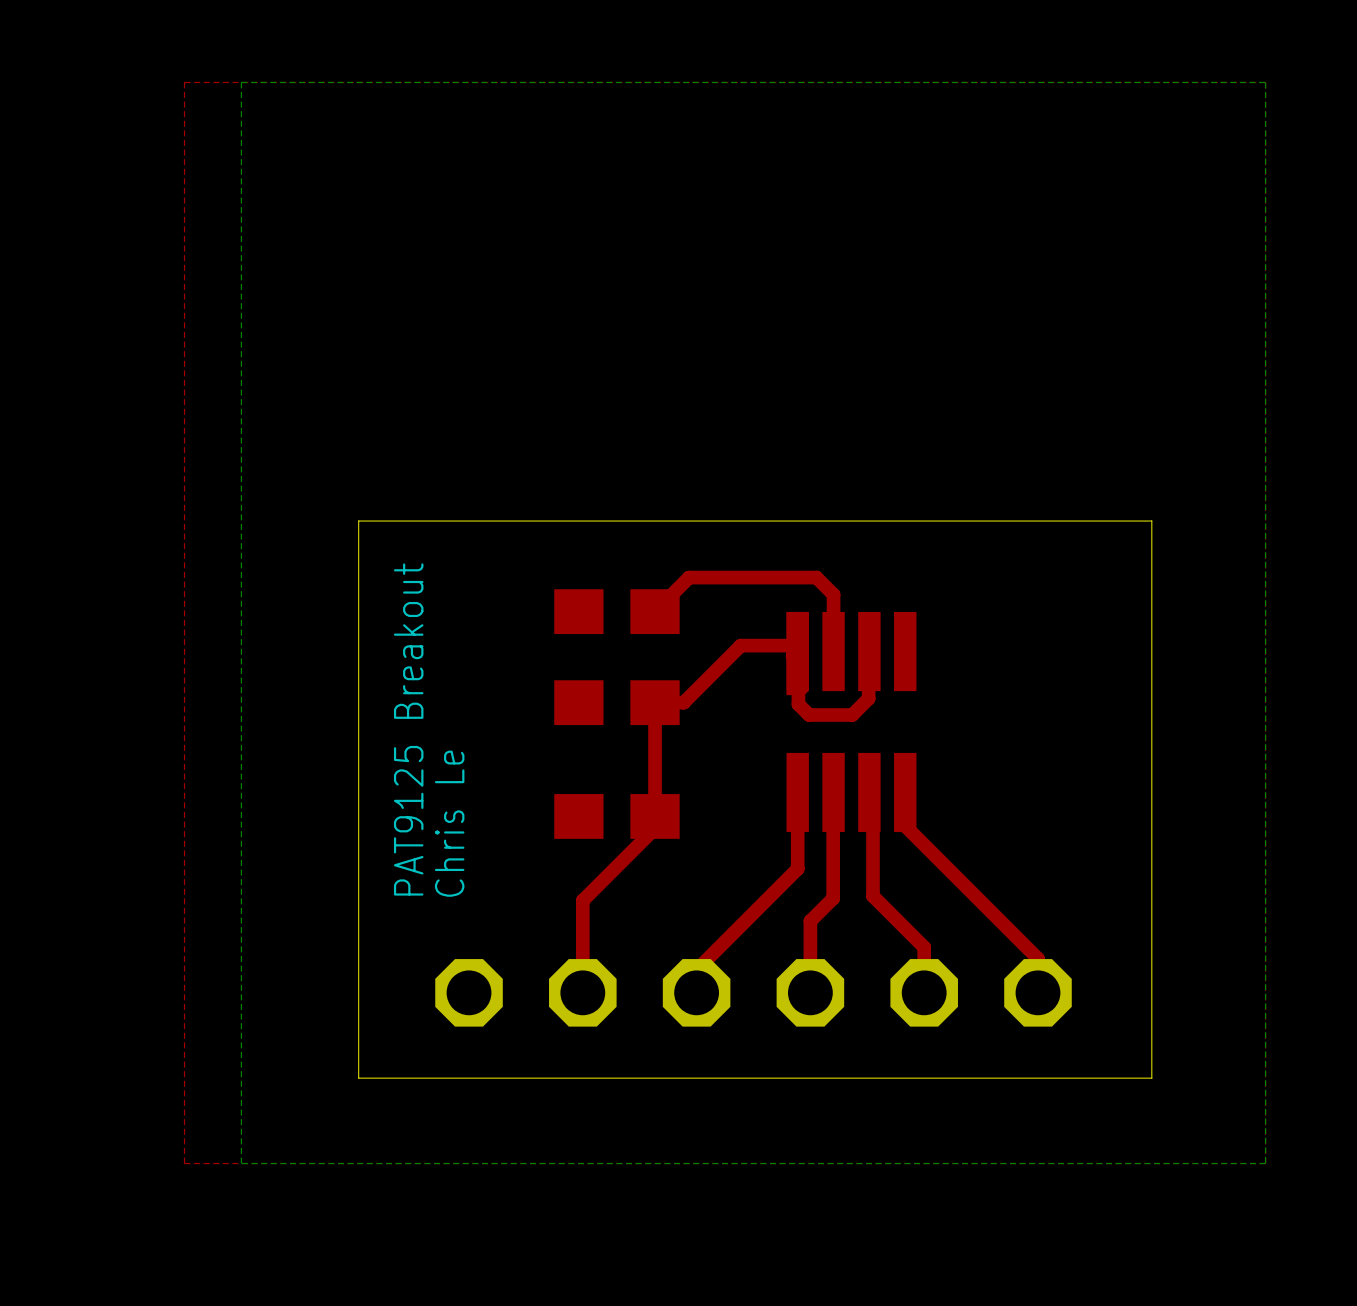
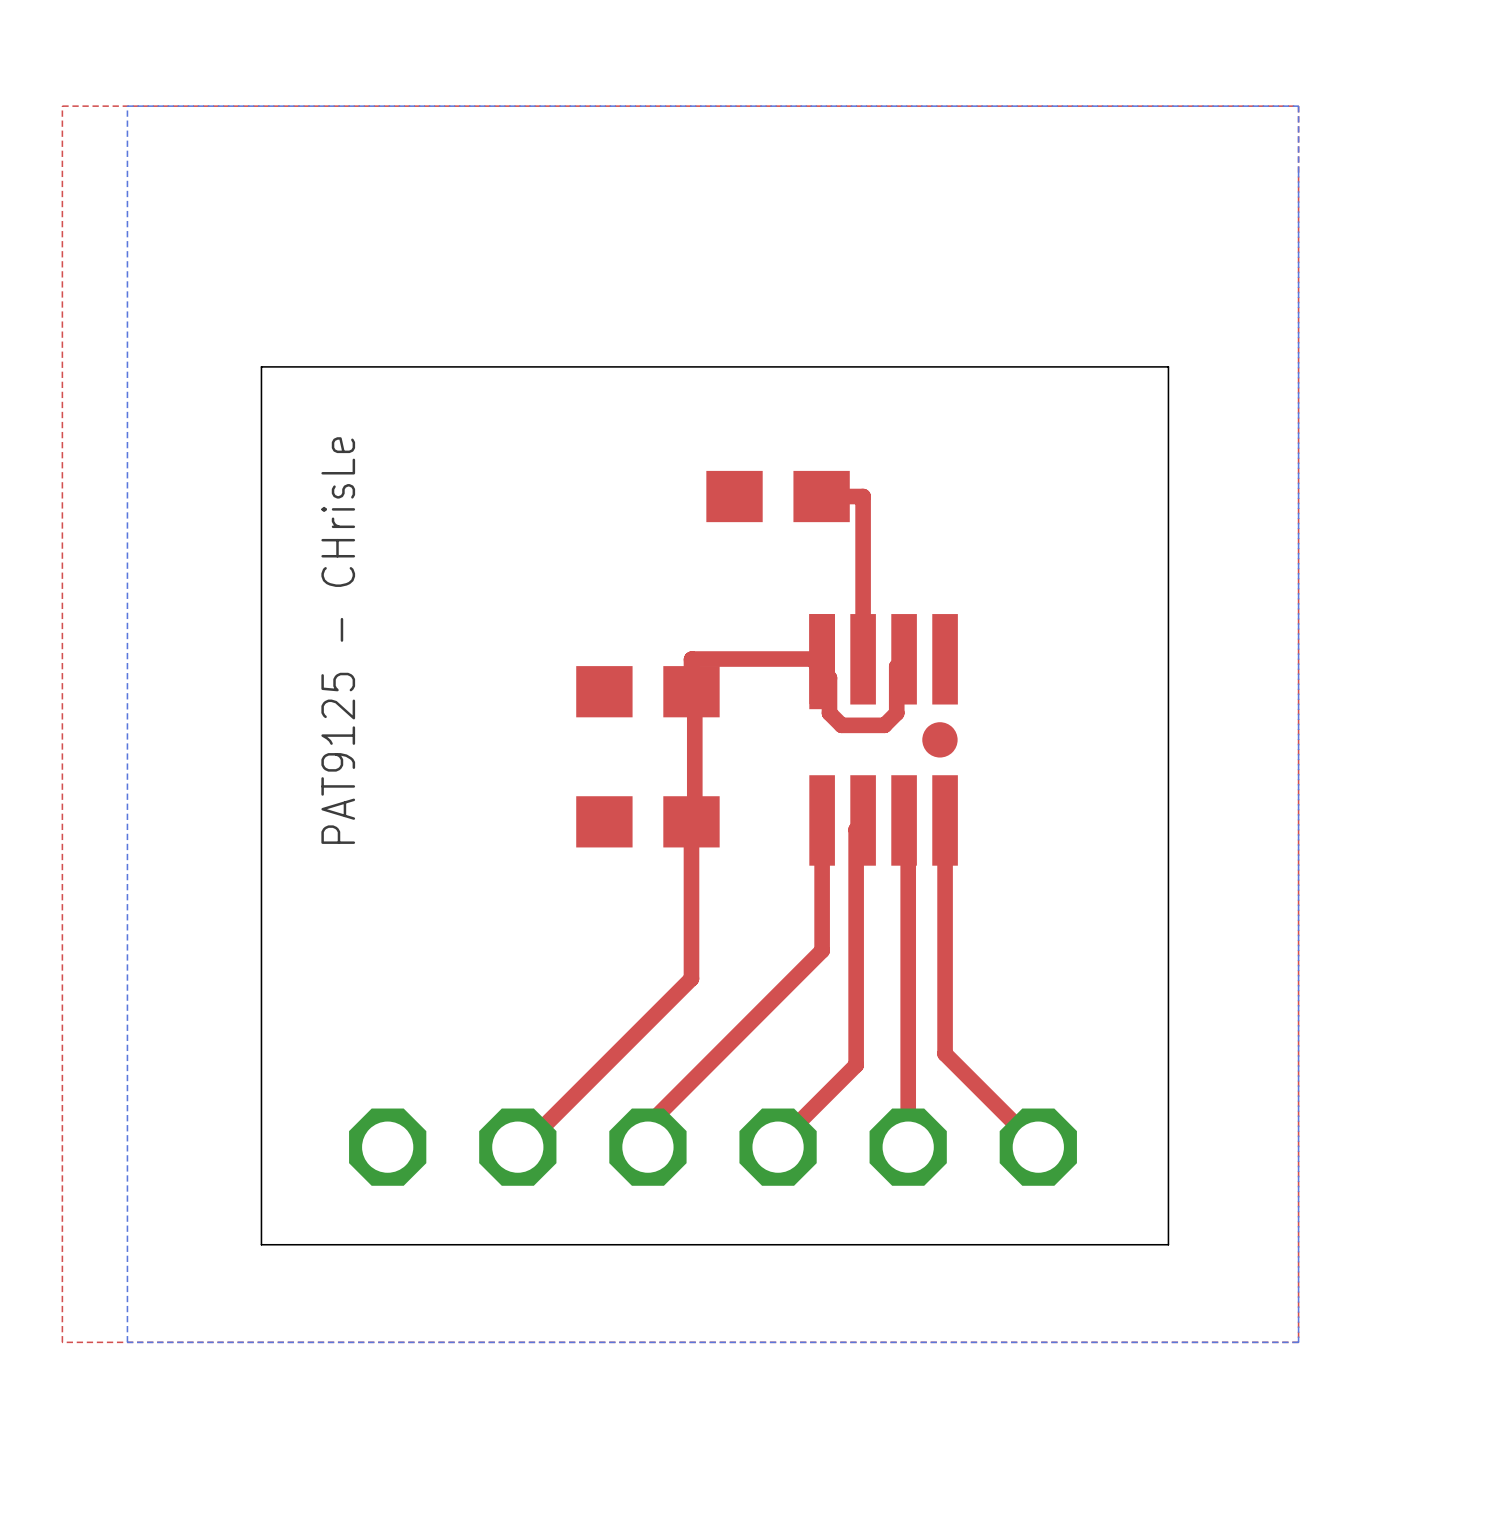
part: none -> (778, 496)
top track: none -> (821, 496) (863, 496) (863, 659)
board edge: (1151, 521) (358, 521) -> (1168, 607) (1168, 366) (261, 366) (261, 607)
top track: none -> (692, 659) (822, 659) (816, 664) (829, 678) (829, 713) (841, 725) (884, 725) (896, 713) (896, 666) (904, 659)
top track: none -> (691, 659) (691, 691) (694, 699) (694, 808) (691, 821)
part: none -> (647, 691)
part: (616, 611) -> none
top track: (655, 611) (689, 577) (816, 577) (833, 594) (833, 651) -> none
part: none -> (883, 739)
top track: (869, 651) (868, 698) (852, 715) (809, 715) (798, 704) (798, 662) (792, 656) (797, 651) (792, 645) (740, 645) (683, 702) (655, 702) (655, 828) (582, 900) (582, 992) -> (691, 821) (691, 978) (523, 1147) (517, 1147)
part: (616, 702) -> none
part: none -> (647, 821)
part: (851, 722) -> none
text: PAT9125 Breakout (408, 729) -> PAT9125 - CHrisLe (338, 640)
top track: (797, 792) (797, 868) (696, 970) (696, 973) -> (822, 820) (822, 950) (647, 1125)
top track: (869, 792) (872, 796) (872, 896) (924, 947) -> (904, 820) (908, 824) (908, 1095)
top track: (905, 792) (905, 825) (1037, 958) (1037, 992) -> (945, 820) (945, 1053) (1038, 1147)
top track: (833, 793) (833, 898) (810, 921) (810, 989) -> (863, 820) (856, 829) (856, 1065) (778, 1143)
part: (616, 816) -> none
text: Chris Le (449, 823) -> none

